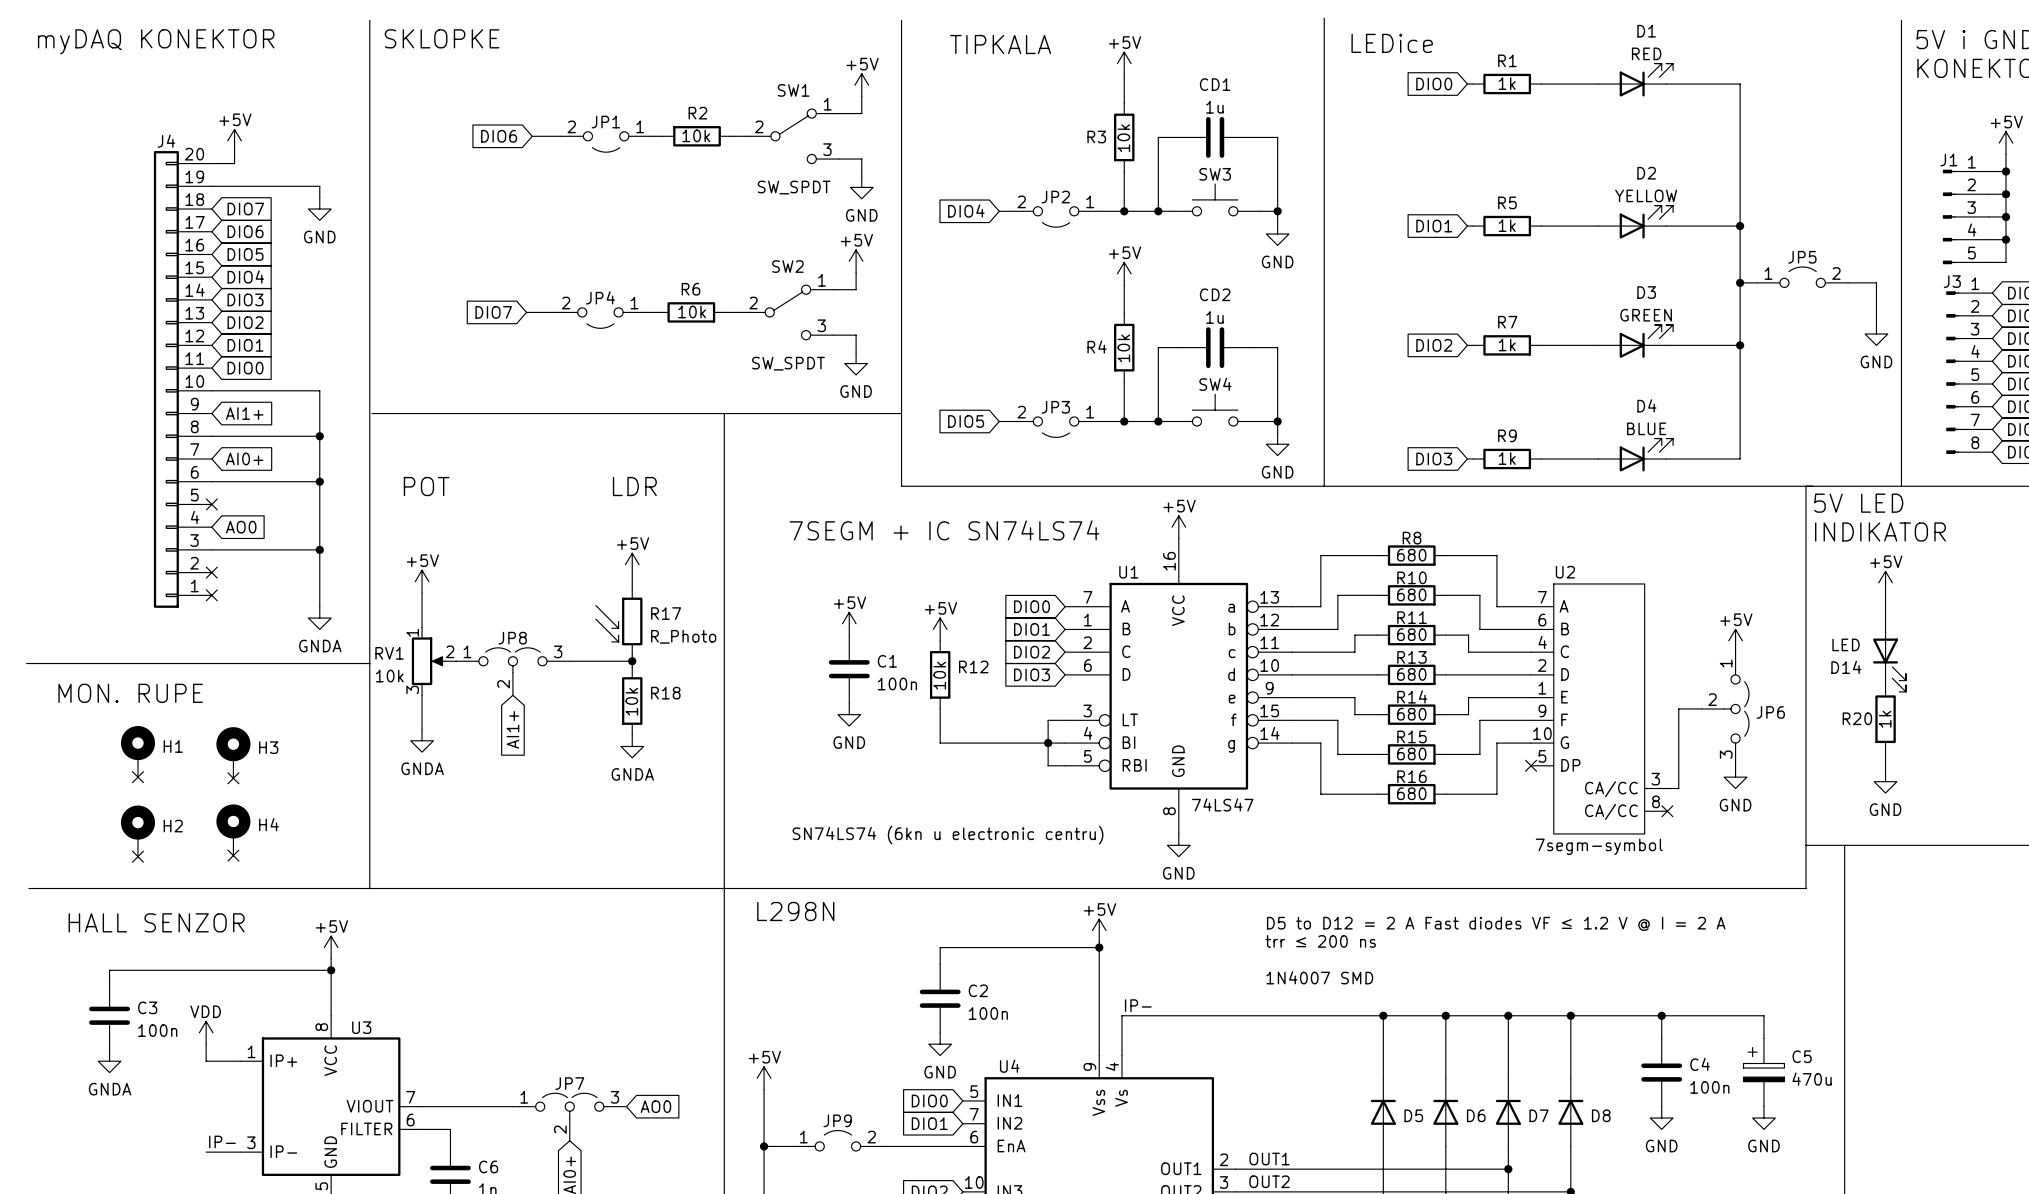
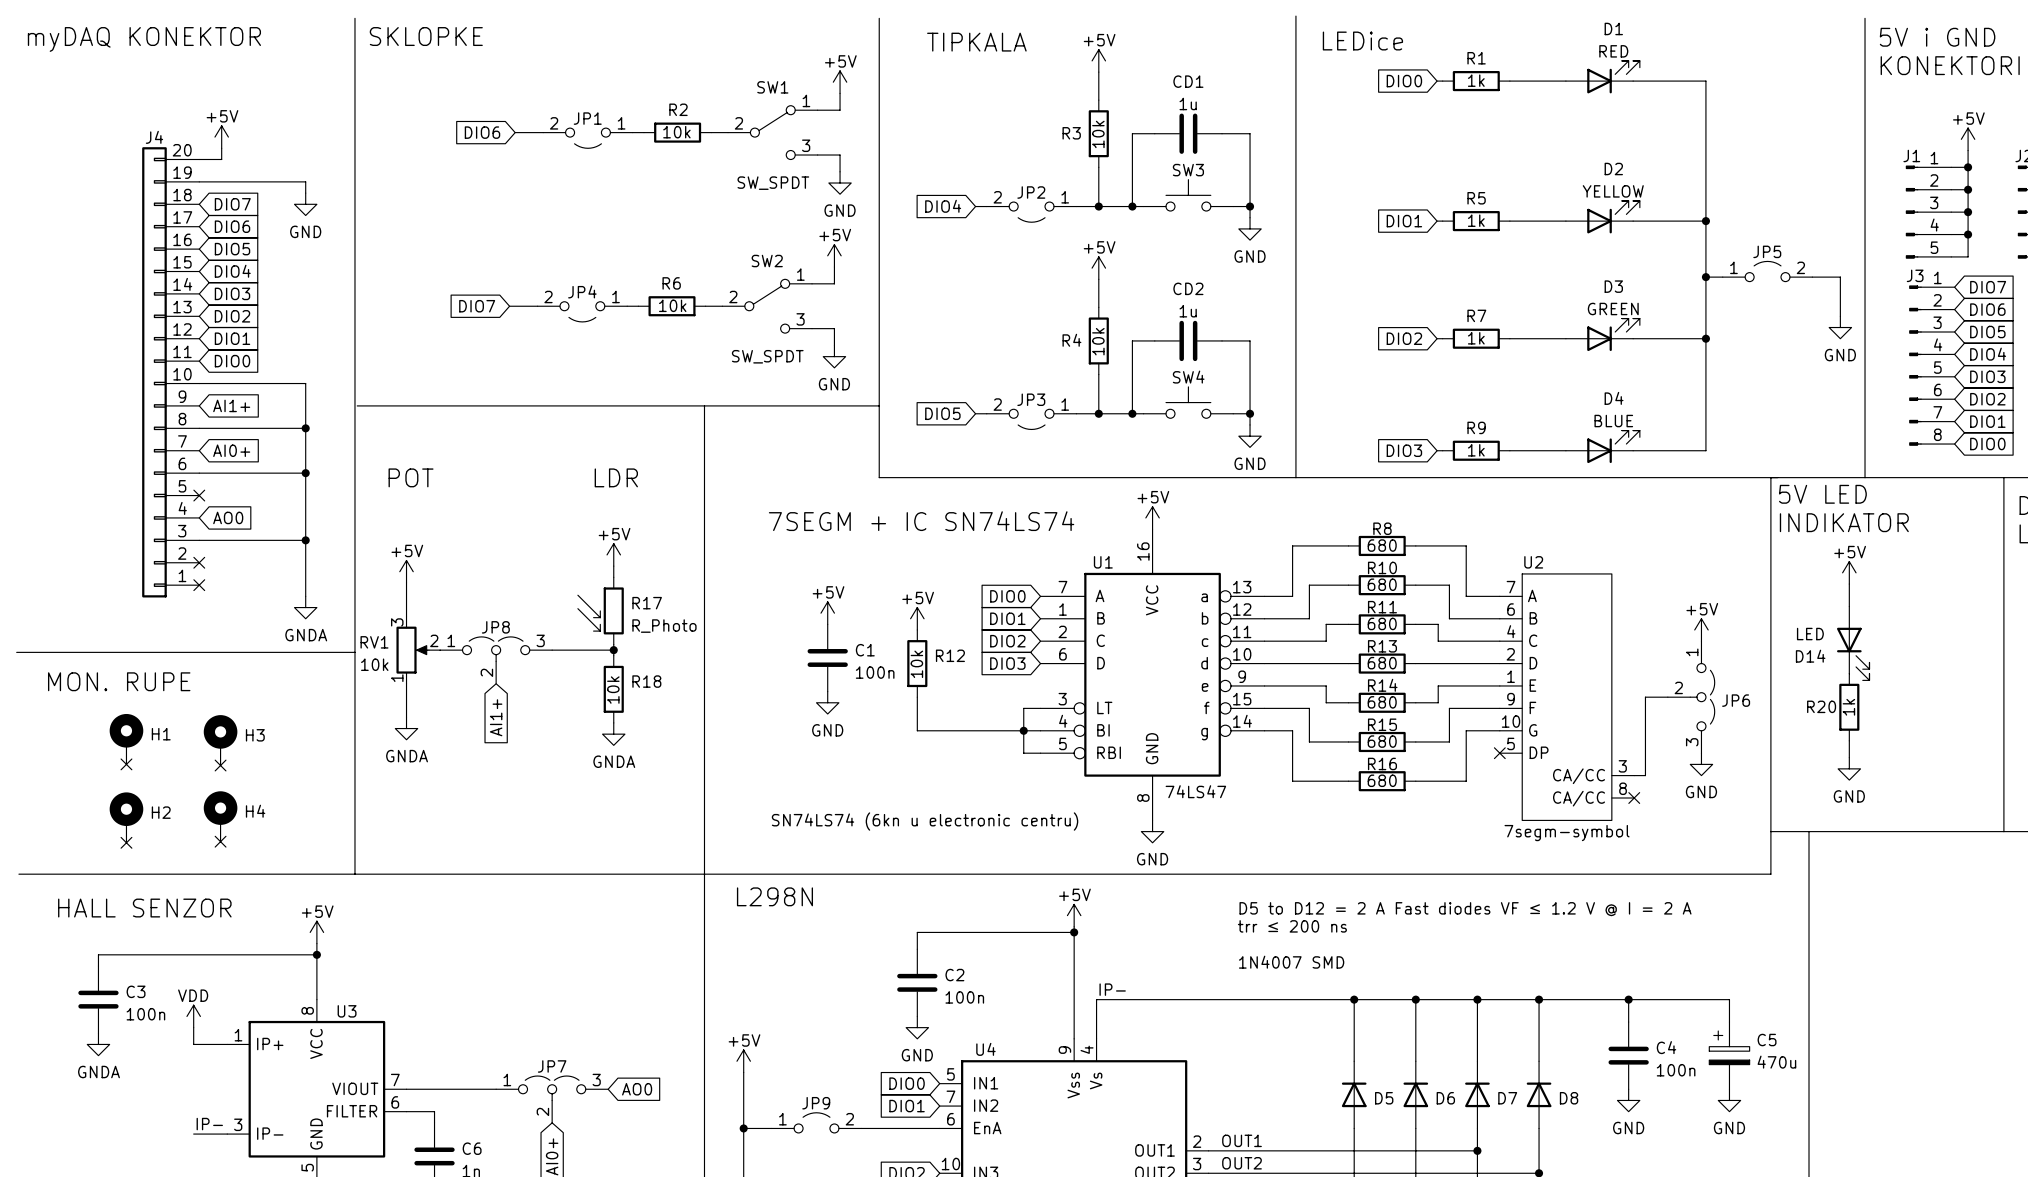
RV1 flip: as is (428, 661) -> up-down (412, 650)

